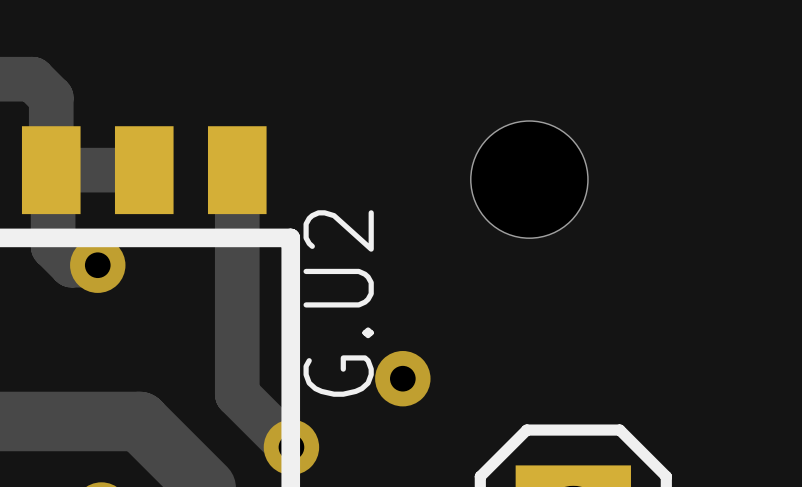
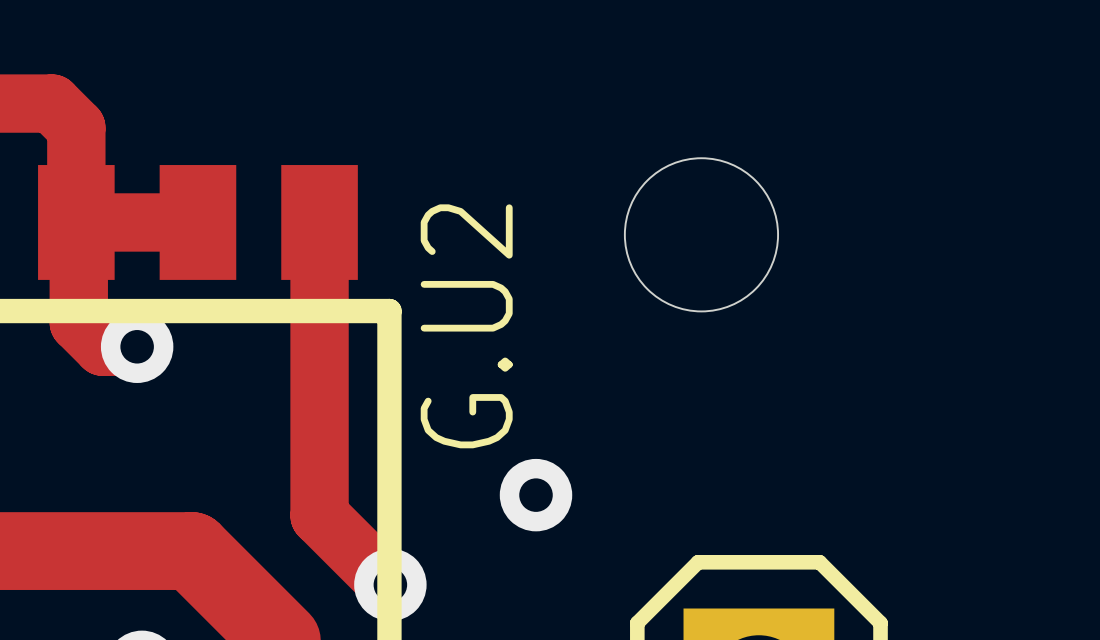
G.U2 name position: G.U2 (338, 303) -> G.U2 (466, 326)

